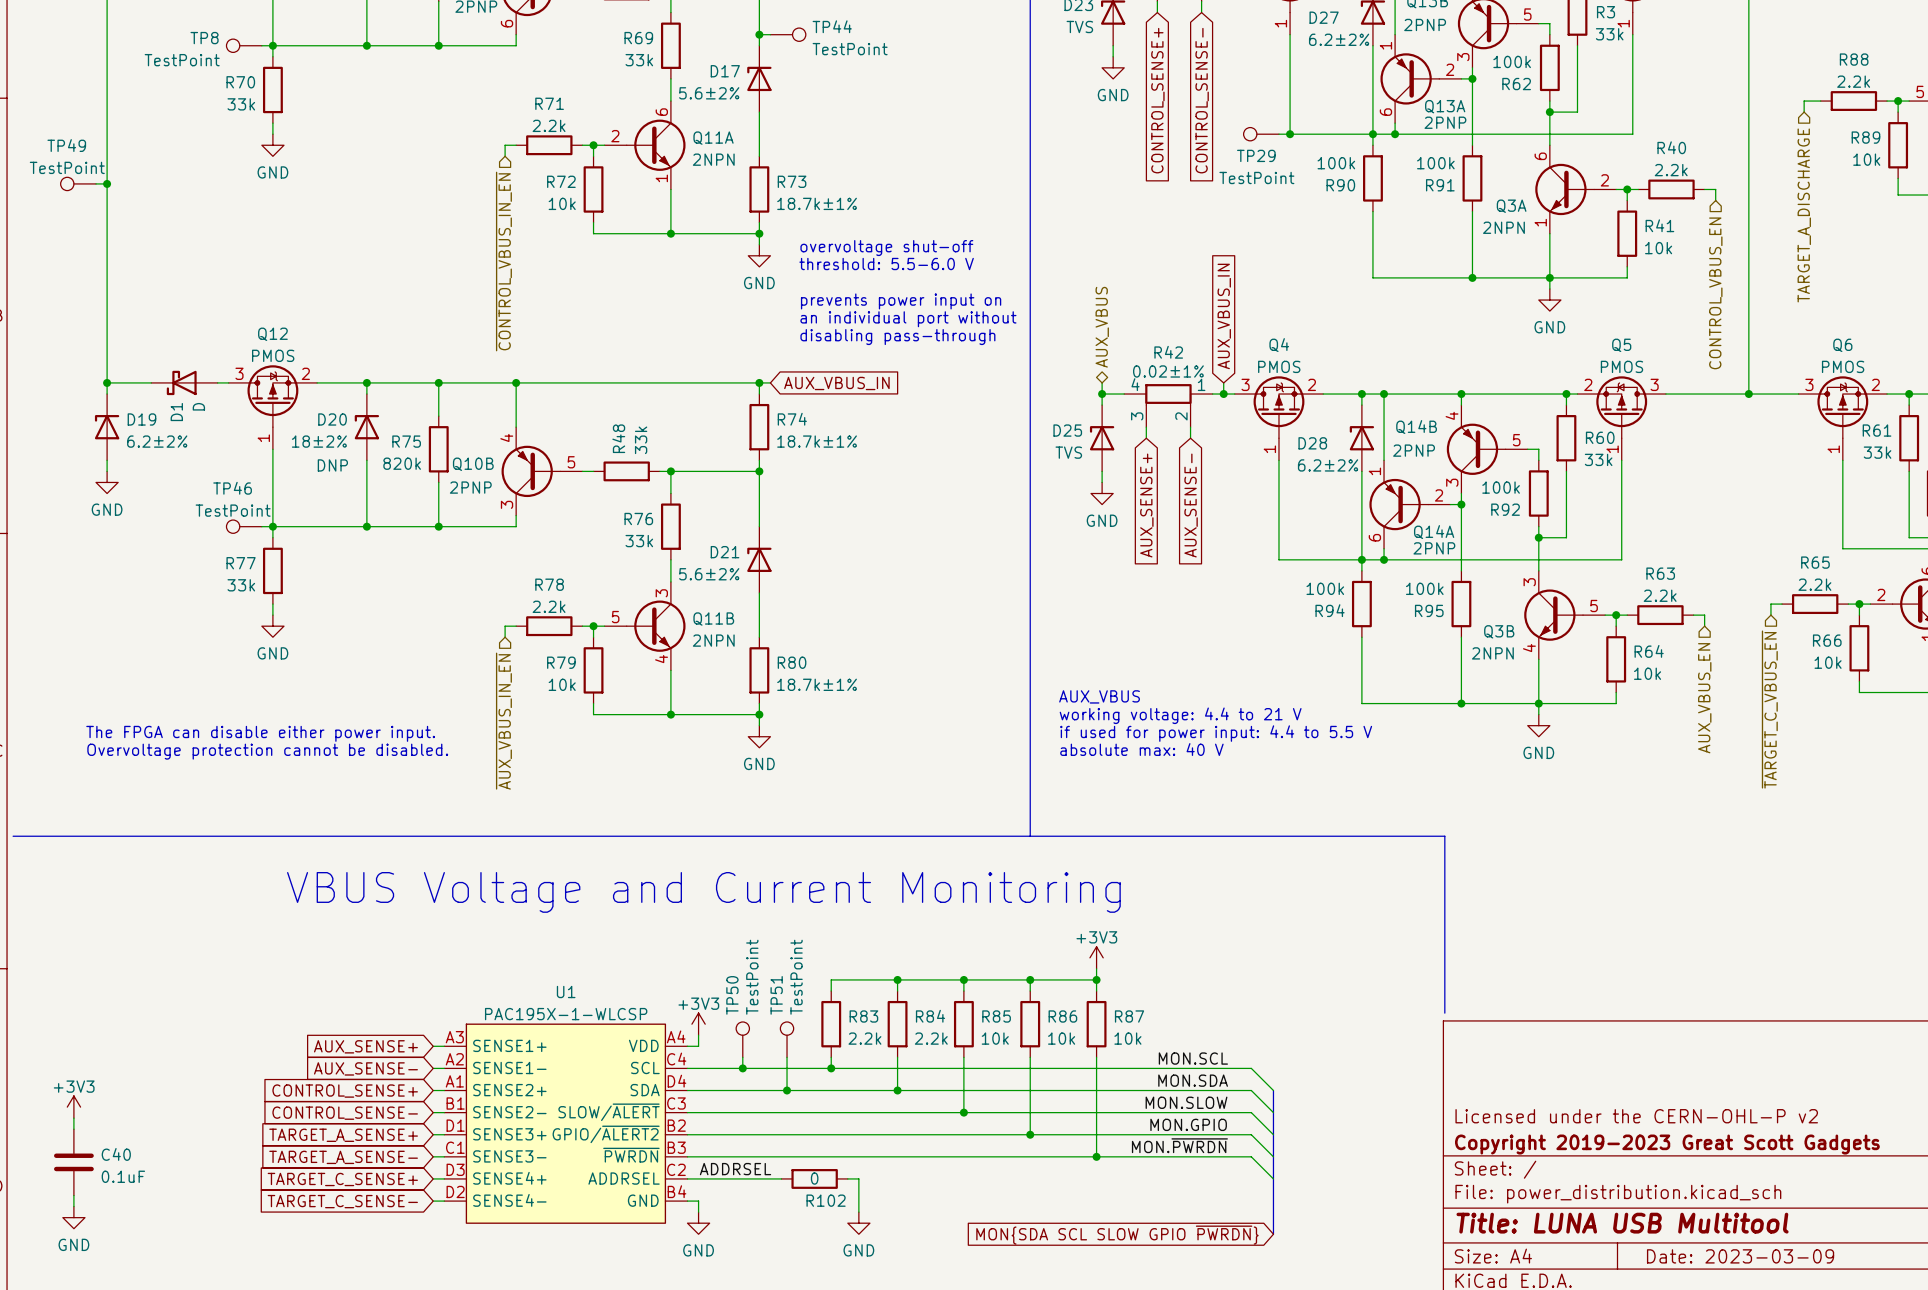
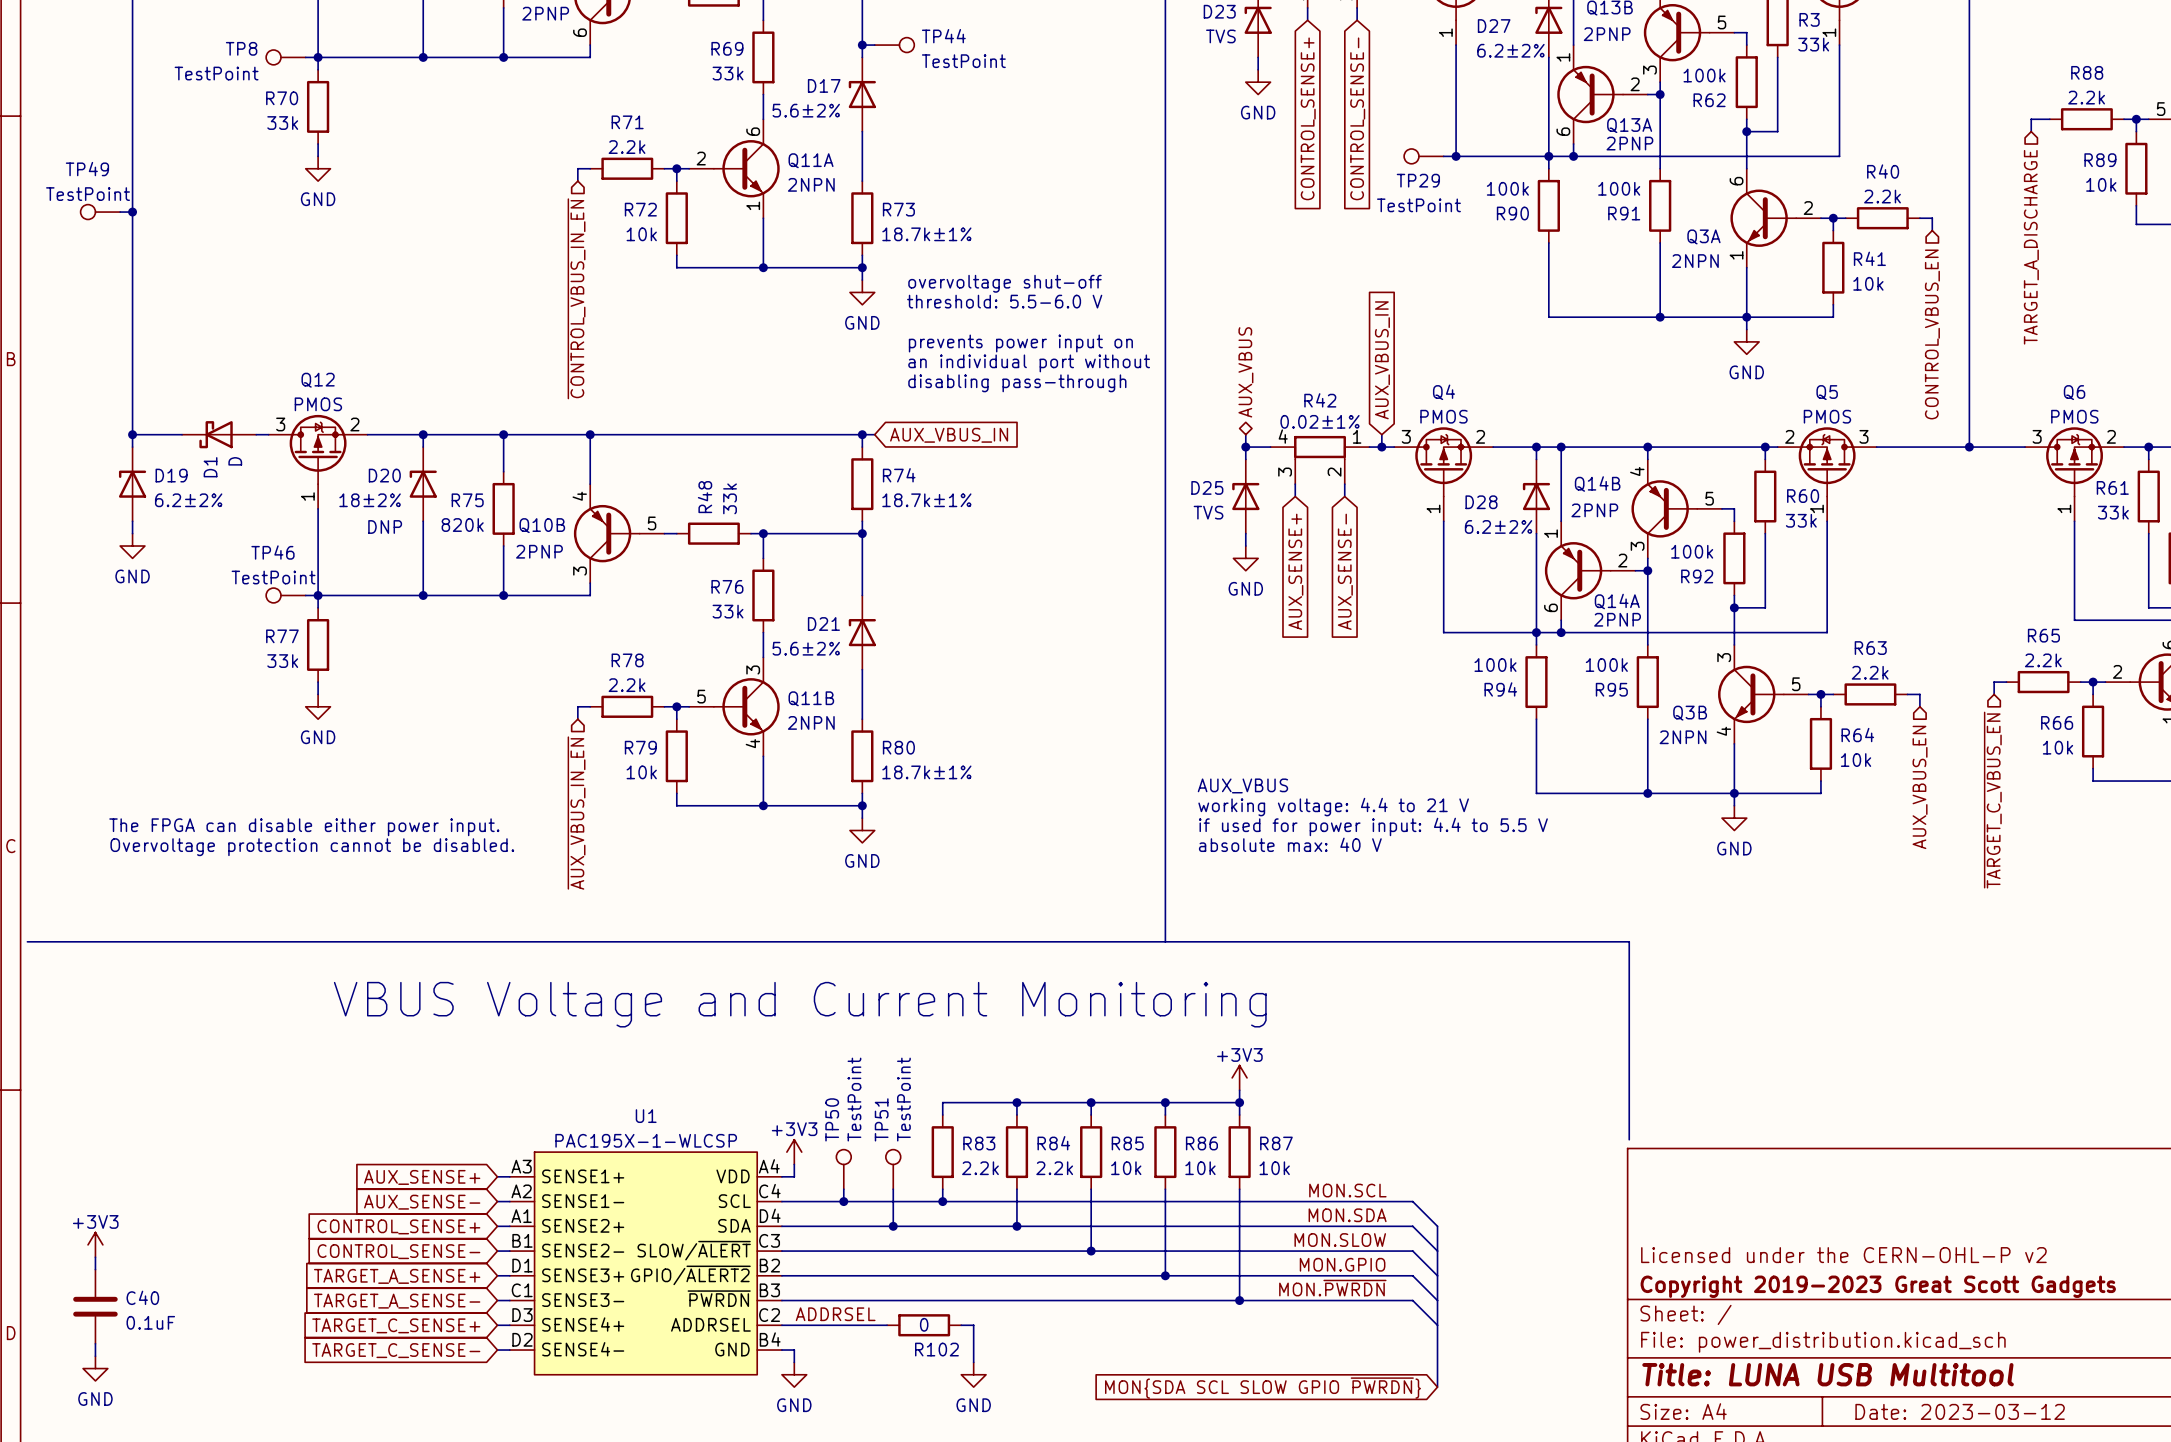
title block: Date: 2023-03-09 (1740, 1256) -> Date: 2023-03-12 (1960, 1411)

